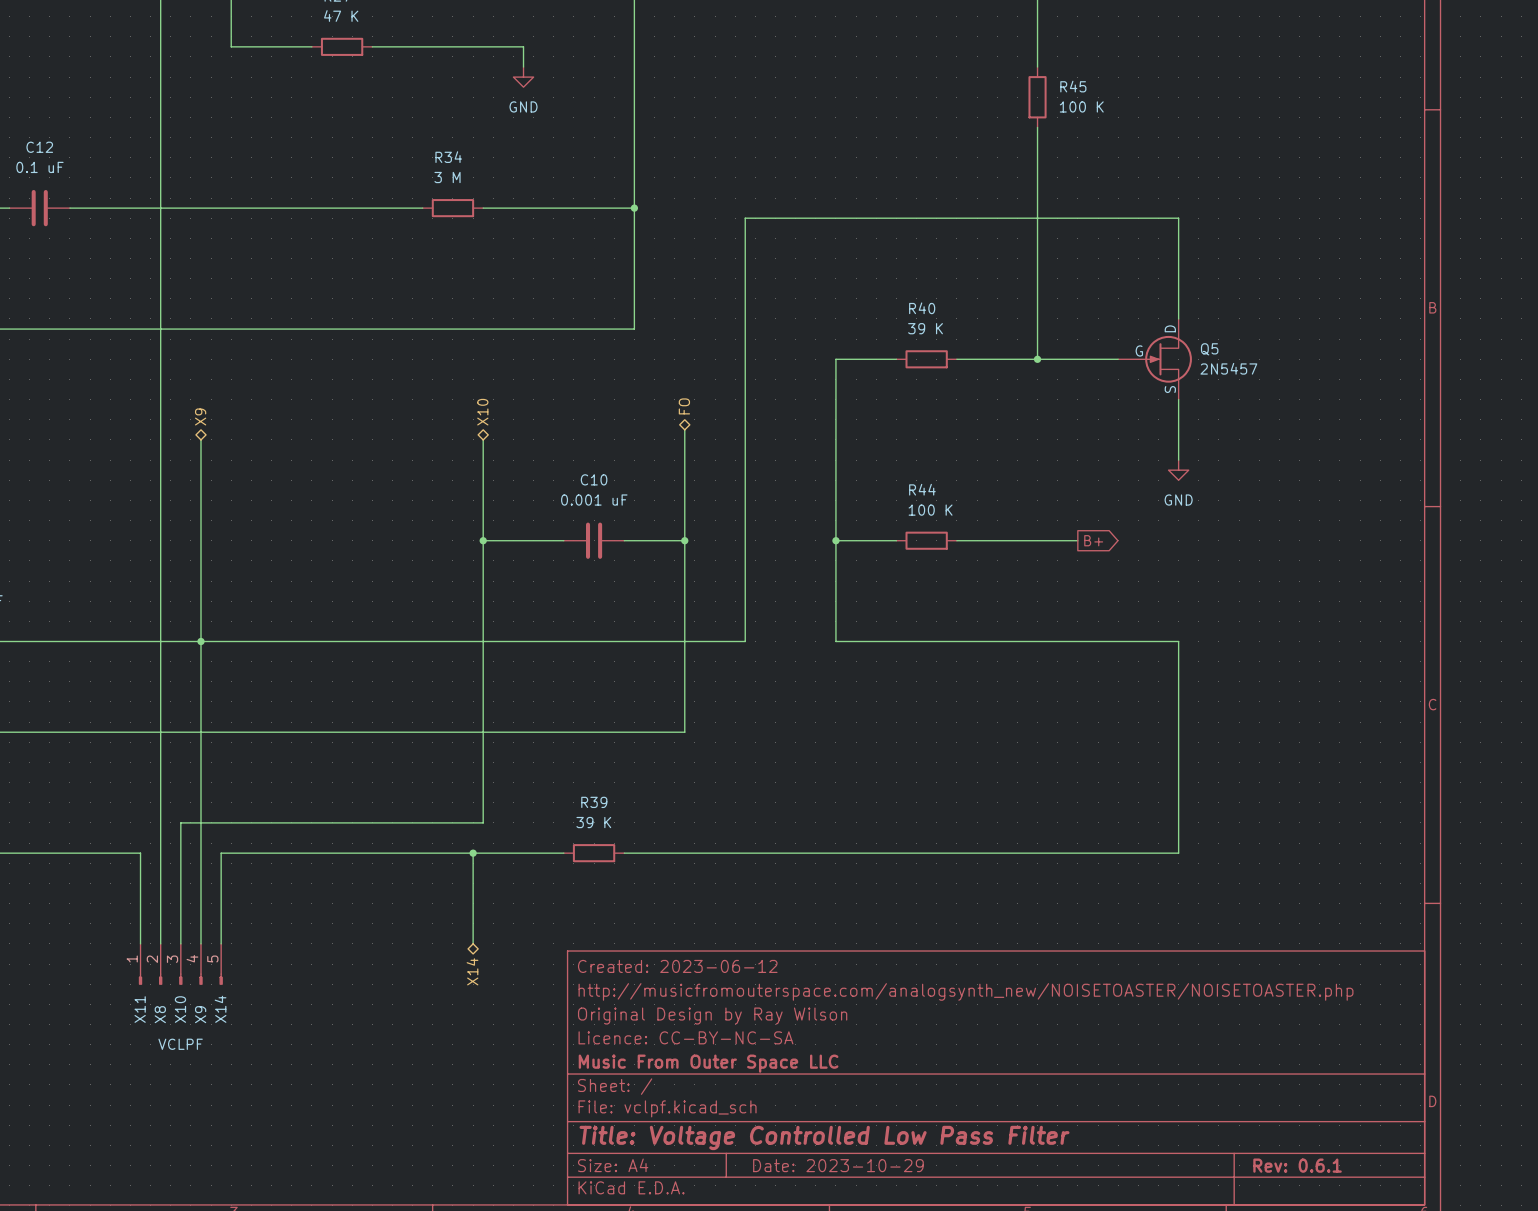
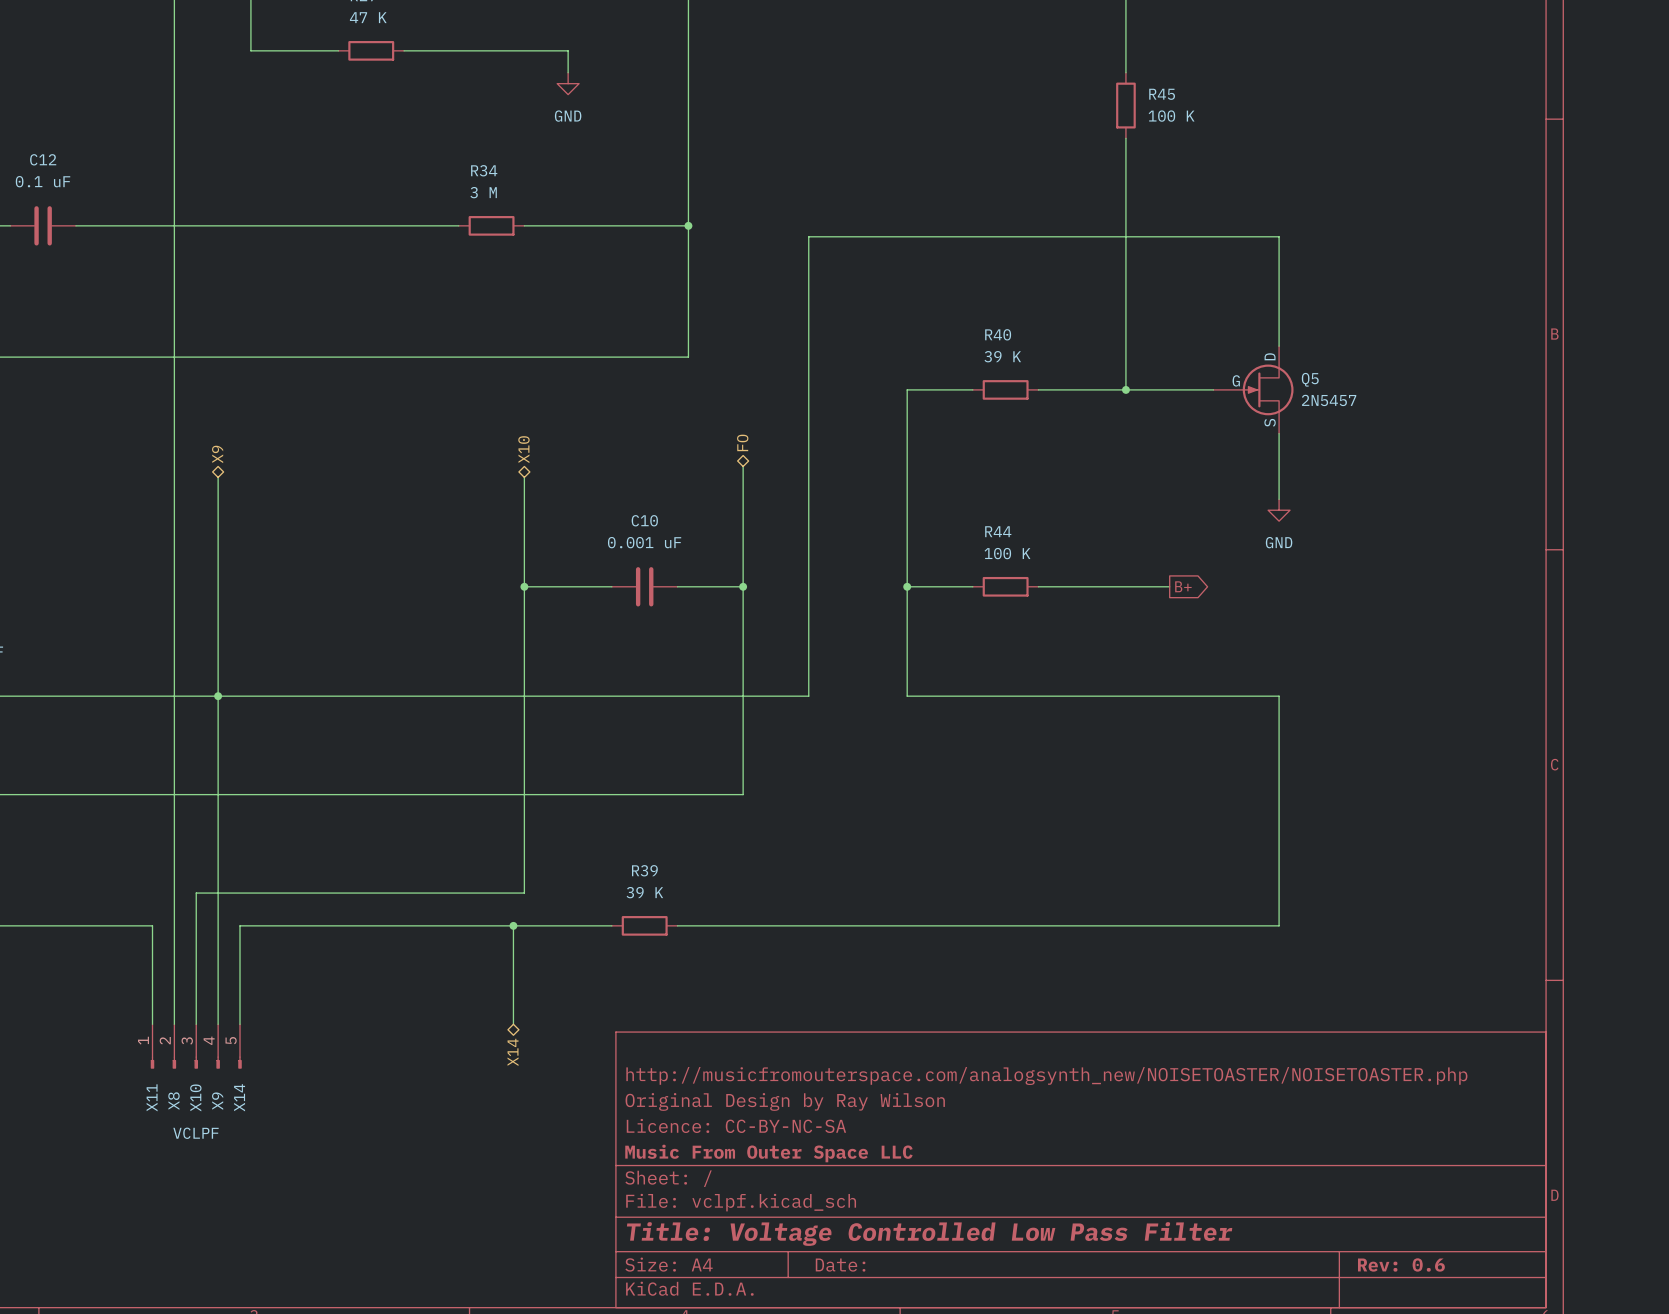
title block: Created: 2023-06-12 (677, 966) -> none
title block: Date: 2023-10-29 (838, 1165) -> Date: (840, 1265)
title block: Rev: 0.6.1 (1297, 1165) -> Rev: 0.6 (1401, 1264)

